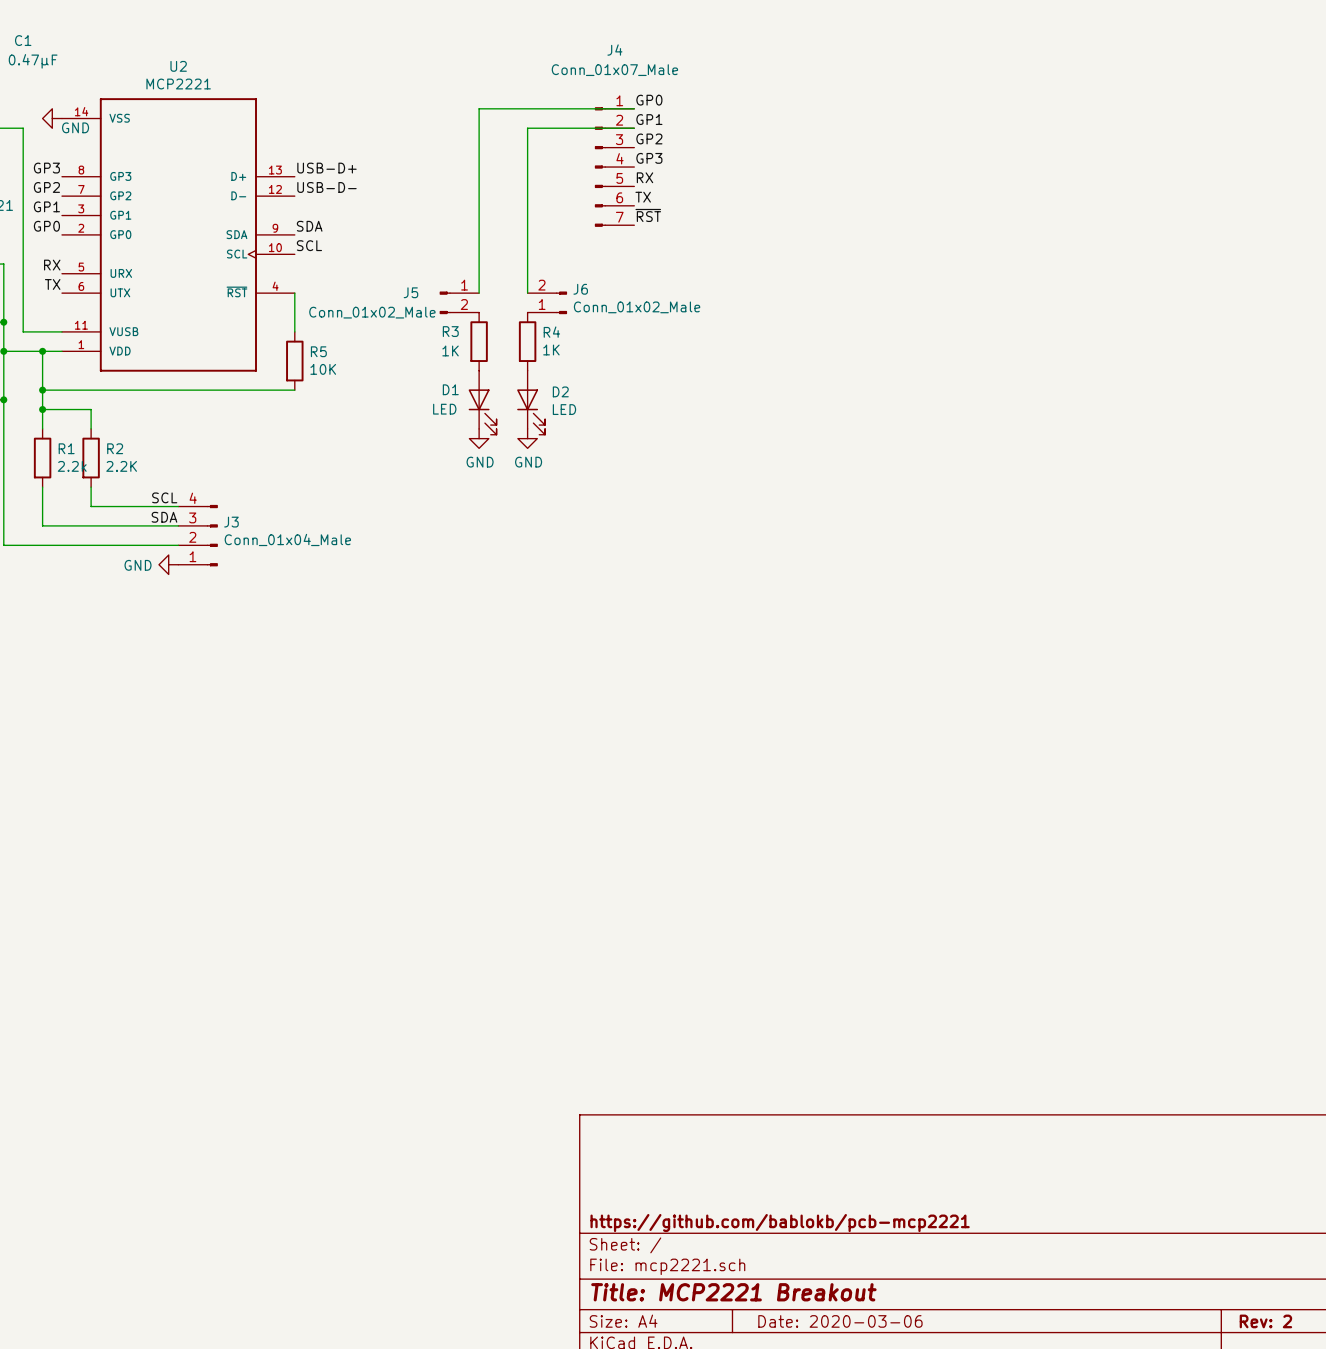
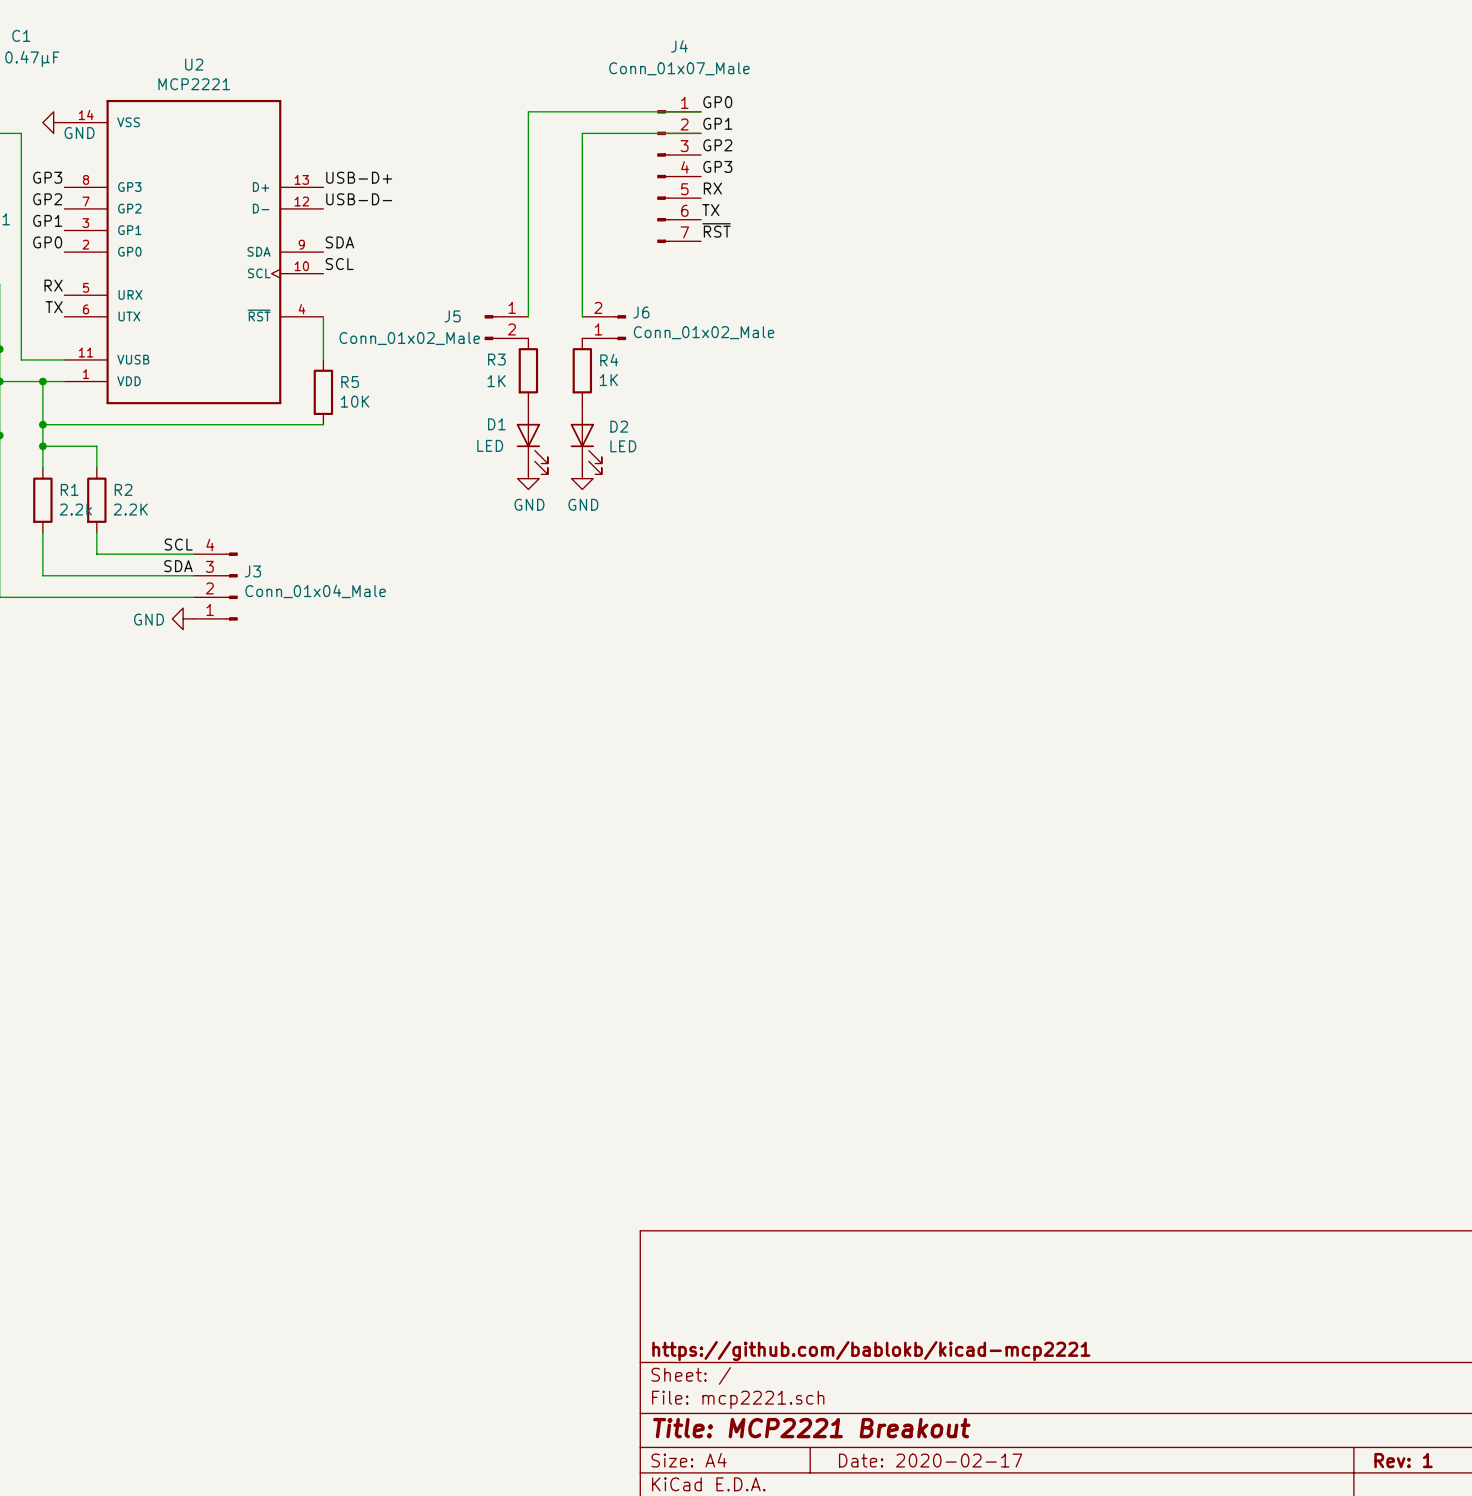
title block: https://github.com/bablokb/pcb-mcp2221 (780, 1223) -> https://github.com/bablokb/kicad-mcp2221 (871, 1351)
title block: Date: 2020-03-06 (840, 1321) -> Date: 2020-02-17 (930, 1460)
title block: Rev: 2 (1265, 1321) -> Rev: 1 (1403, 1460)

